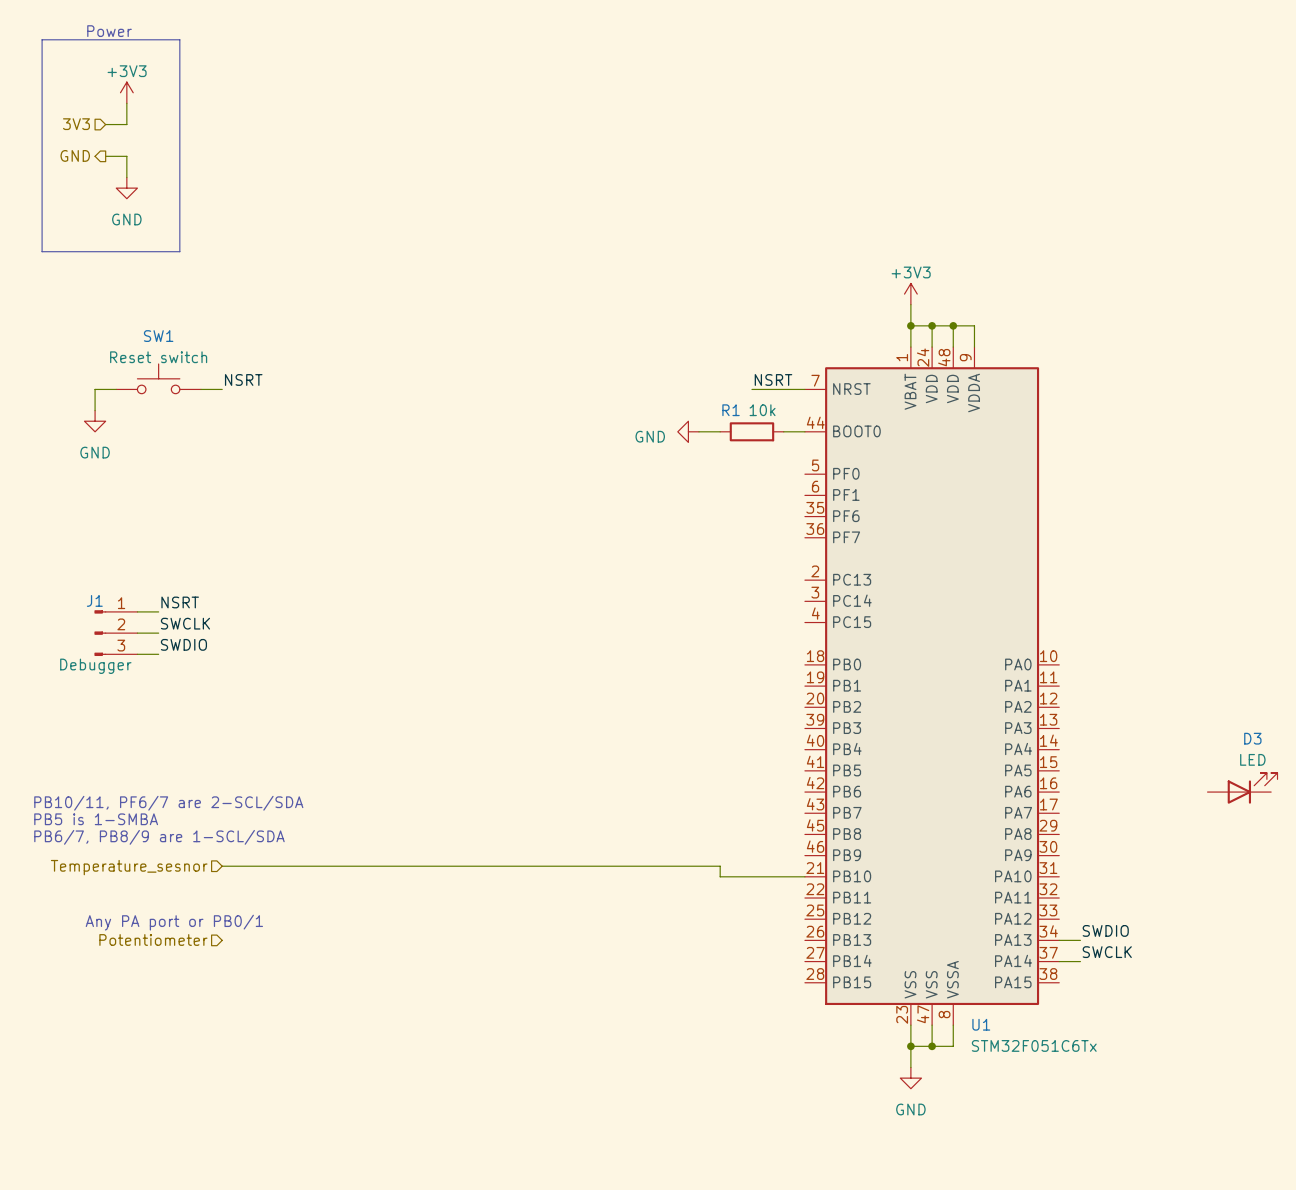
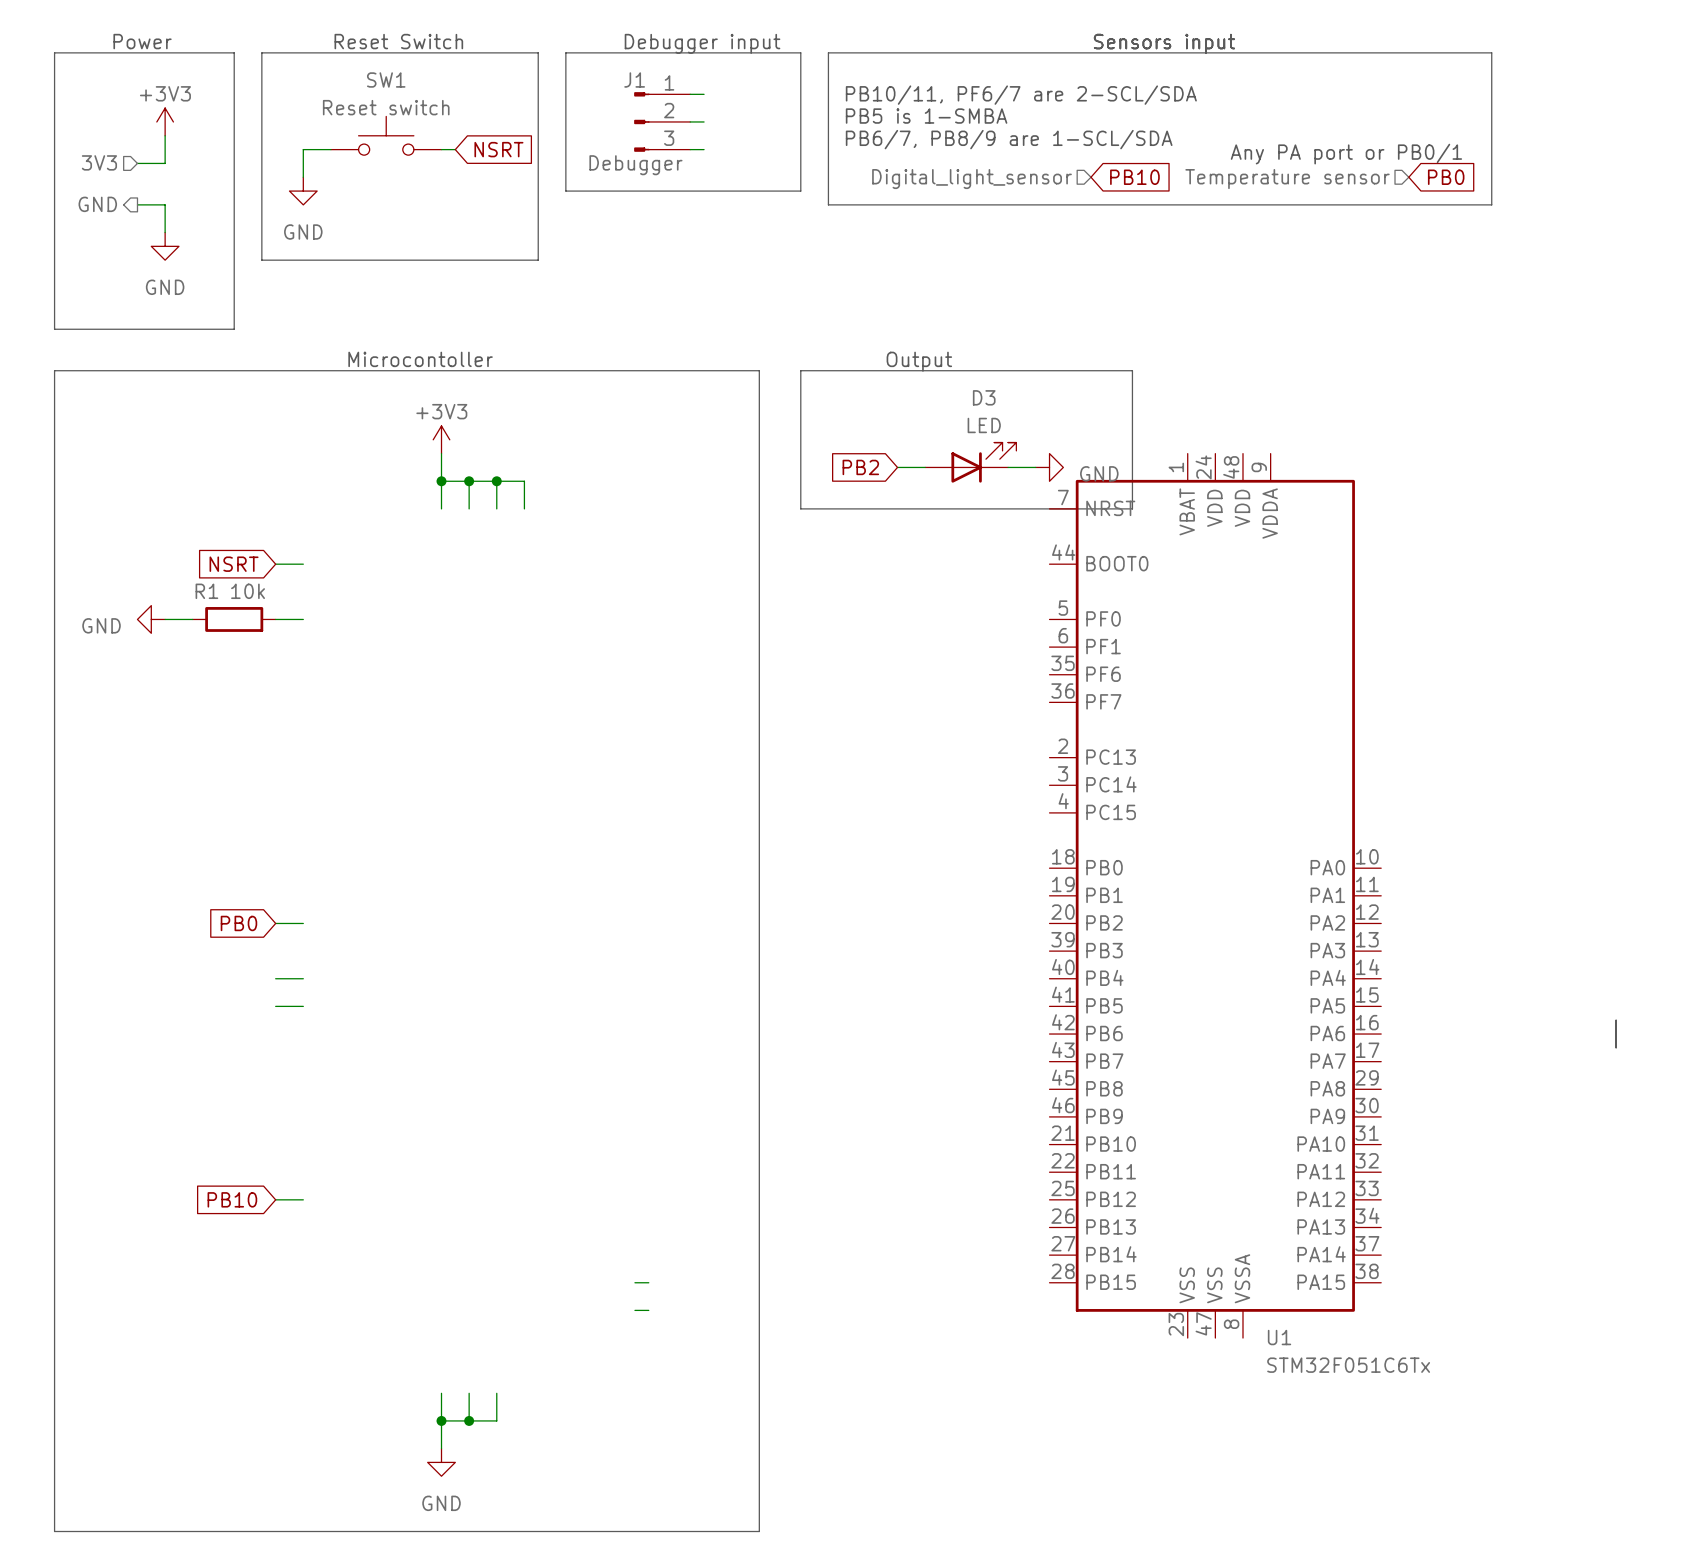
text: none -> Reset Switch (398, 41)
text: none -> Debugger input (702, 43)
text: none -> Sensors input (1164, 43)
line: none -> (261, 52) (538, 52) (538, 260) (261, 260) (261, 52)
line: none -> (565, 52) (800, 52) (800, 191) (565, 191) (565, 52)
line: none -> (828, 52) (1491, 52) (1491, 204) (828, 204) (828, 52)
wire: none -> (690, 94) (704, 94)
text: none -> PB10/11, PF6/7 are 2-SCL/SDA (1021, 95)
text: none -> PB5 is 1-SMBA (926, 116)
wire: none -> (690, 121) (704, 121)
text: none -> PB6/7, PB8/9 are 1-SCL/SDA (1009, 139)
wire: none -> (330, 149) (303, 149) (303, 177)
wire: none -> (441, 149) (455, 149)
global label: none -> NSRT (498, 149)
wire: none -> (690, 149) (704, 149)
text: none -> Any PA port or PB0/1 (1346, 154)
global label: none -> PB10 (1134, 177)
global label: none -> PB0 (1446, 177)
hierarchical label: none -> Digital_light_sensor (971, 179)
hierarchical label: none -> Temperature sensor (1287, 179)
power symbol: none -> GND (303, 191)
text: none -> Microcontoller (420, 359)
text: none -> Output (919, 361)
line: none -> (54, 370) (54, 1531) (759, 1531) (759, 370) (54, 370)
line: none -> (800, 370) (800, 508) (1132, 508) (1132, 370) (800, 370)
power symbol: +3V3 (910, 294) -> none
wire: (910, 304) (910, 347) -> none
wire: (910, 325) (974, 325) (974, 347) -> none
junction: (910, 325) -> none
wire: (932, 325) (932, 347) -> none
junction: (932, 325) -> none
wire: (953, 325) (953, 347) -> none
junction: (953, 325) -> none
power symbol: none -> +3V3 (441, 439)
wire: none -> (441, 453) (441, 508)
global label: none -> PB2 (860, 467)
wire: none -> (441, 481) (524, 481) (524, 508)
junction: none -> (441, 481)
wire: none -> (469, 481) (469, 508)
junction: none -> (469, 481)
wire: none -> (496, 481) (496, 508)
junction: none -> (496, 481)
SW1 position: (158, 378) -> (386, 135)
label: NSRT (243, 379) -> none
label: NSRT (773, 379) -> none
wire: (116, 389) (95, 389) (95, 410) -> none
wire: (201, 389) (222, 389) -> (275, 564) (303, 564)
power symbol rotation: 0° (95, 421) -> 90° clockwise (151, 619)
power symbol position: GND (95, 421) -> GND (151, 619)
global label: none -> NSRT (234, 564)
power symbol rotation: 0° (688, 431) -> 180° (1049, 467)
power symbol position: GND (688, 431) -> GND (1049, 467)
wire: (698, 431) (720, 431) -> (897, 467) (925, 467)
R1 position: (751, 431) -> (234, 619)
wire: (783, 431) (804, 431) -> (1008, 467) (1035, 467)
wire: none -> (165, 619) (192, 619)
wire: none -> (275, 619) (303, 619)
label: NSRT (180, 602) -> none
wire: (137, 611) (158, 611) -> (275, 923) (303, 923)
label: SWCLK (185, 623) -> none
J1 position: (115, 633) -> (662, 121)
wire: (137, 633) (158, 633) -> (275, 1006) (303, 1006)
label: SWDIO (183, 644) -> none
wire: (137, 654) (158, 654) -> (275, 978) (303, 978)
global label: none -> PB0 (238, 923)
line: none -> (1616, 1020) (1616, 1047)
D3 position: (1242, 788) -> (970, 462)
text: PB10/11, PF6/7 are 2-SCL/SDA (168, 803) -> none
text: PB5 is 1-SMBA (96, 819) -> none
text: PB6/7, PB8/9 are 1-SCL/SDA (159, 837) -> none
wire: (222, 866) (720, 866) (720, 876) (804, 876) -> none
hierarchical label: Temperature_sesnor (129, 867) -> none
global label: none -> PB10 (232, 1199)
wire: none -> (275, 1199) (303, 1199)
text: Any PA port or PB0/1 (174, 922) -> none
label: SWDIO (1105, 930) -> none
hierarchical label: Potentiometer (153, 939) -> none
wire: (1059, 940) (1080, 940) -> none
label: SWCLK (1107, 952) -> none
wire: (1059, 961) (1080, 961) -> none
wire: none -> (634, 1282) (648, 1282)
wire: none -> (634, 1310) (648, 1310)
wire: (910, 1025) (910, 1067) -> none
wire: (932, 1025) (932, 1046) -> none
wire: (953, 1025) (953, 1046) (910, 1046) -> none
junction: (910, 1046) -> none
junction: (932, 1046) -> none
wire: none -> (441, 1393) (441, 1448)
wire: none -> (469, 1393) (469, 1420)
wire: none -> (496, 1393) (496, 1420) (441, 1420)
power symbol: GND (910, 1078) -> none
junction: none -> (441, 1420)
junction: none -> (469, 1420)
power symbol: none -> GND (441, 1462)

